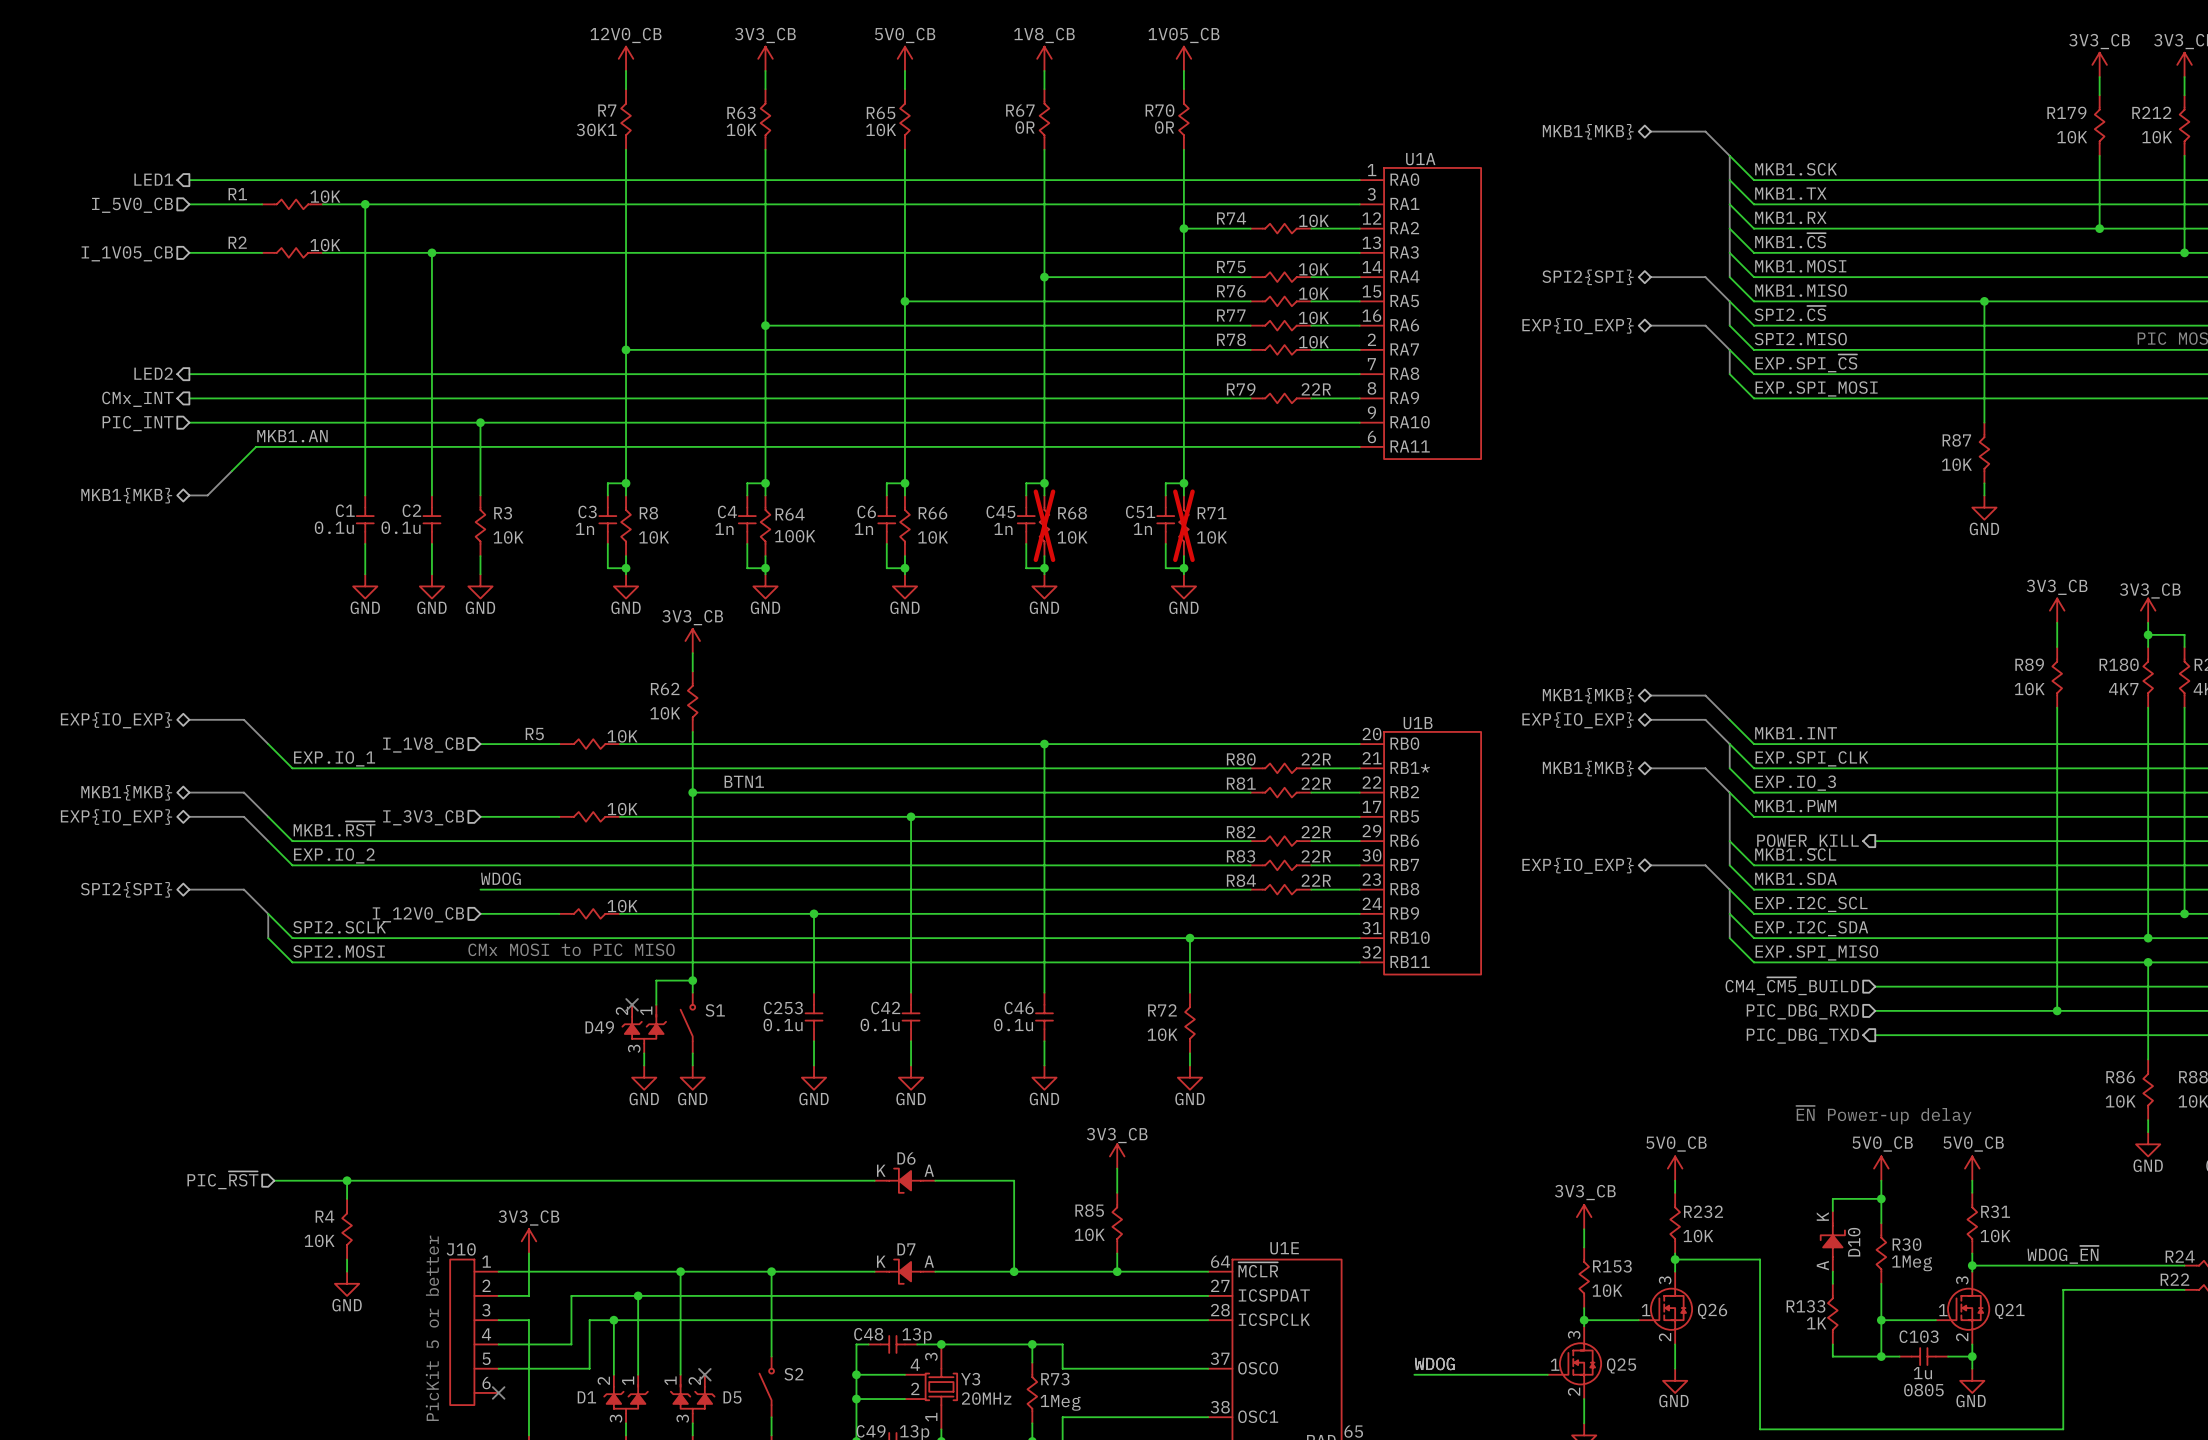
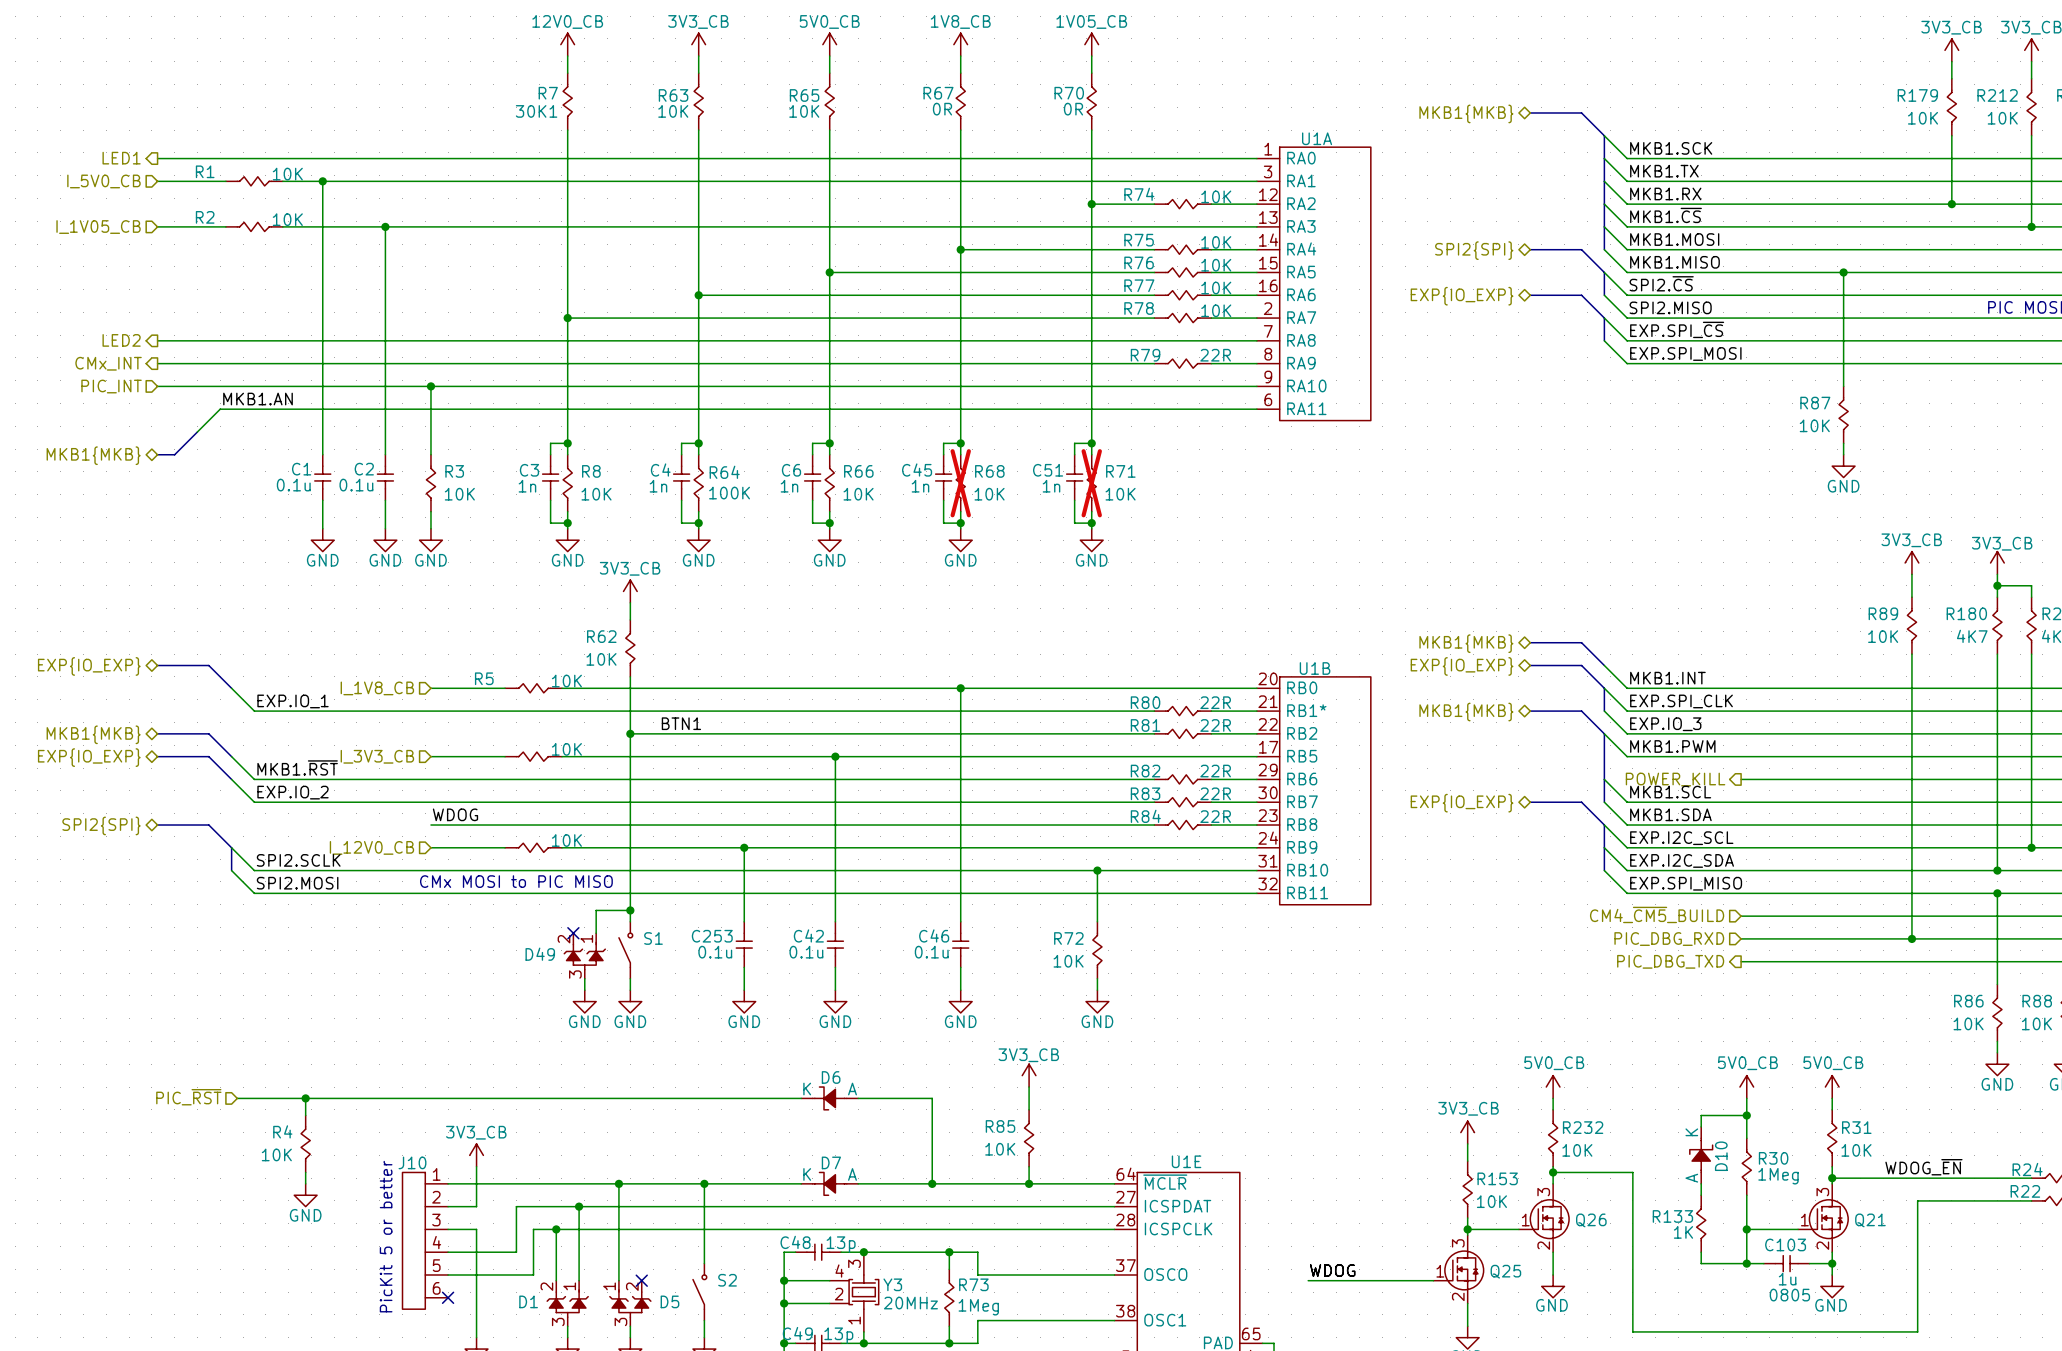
text: ~{EN} Power-up delay (1883, 1115) -> none

